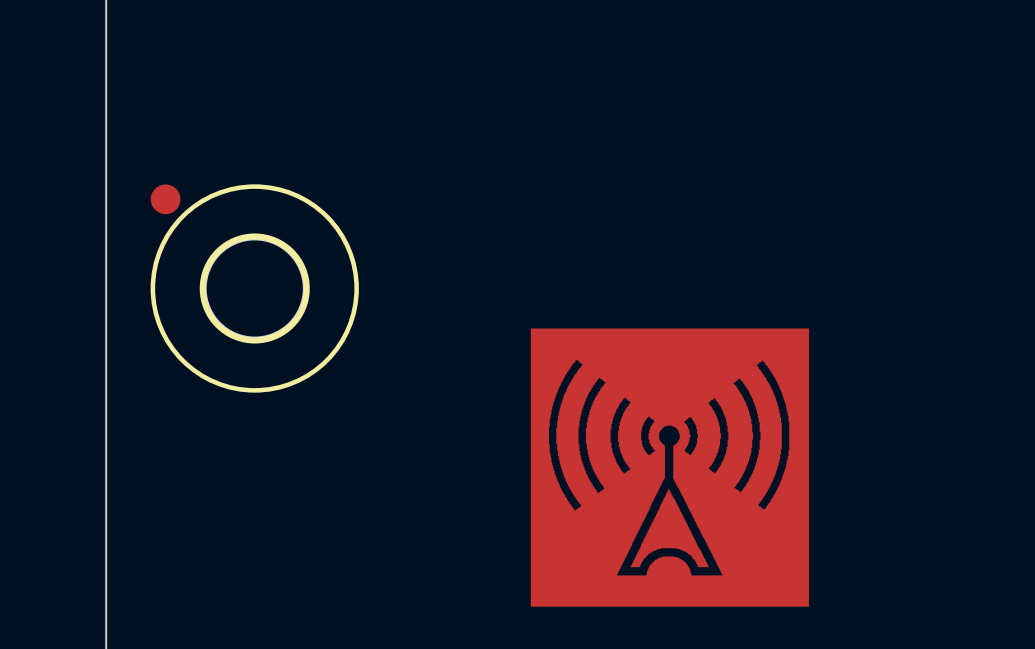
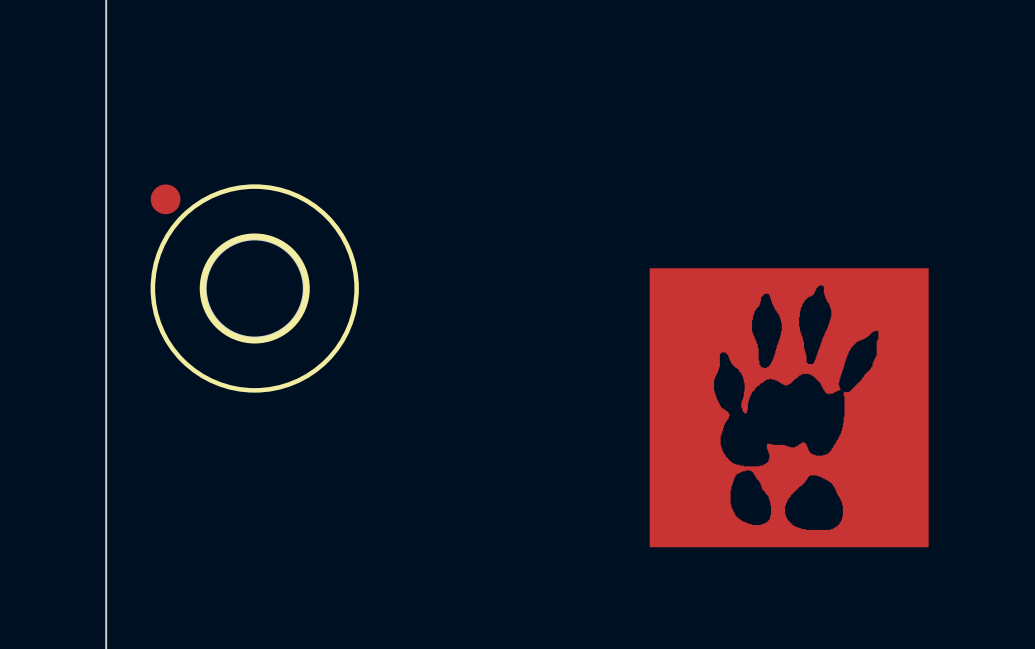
drawing: none -> [649, 268, 929, 548]
drawing: [530, 328, 810, 607] -> none

